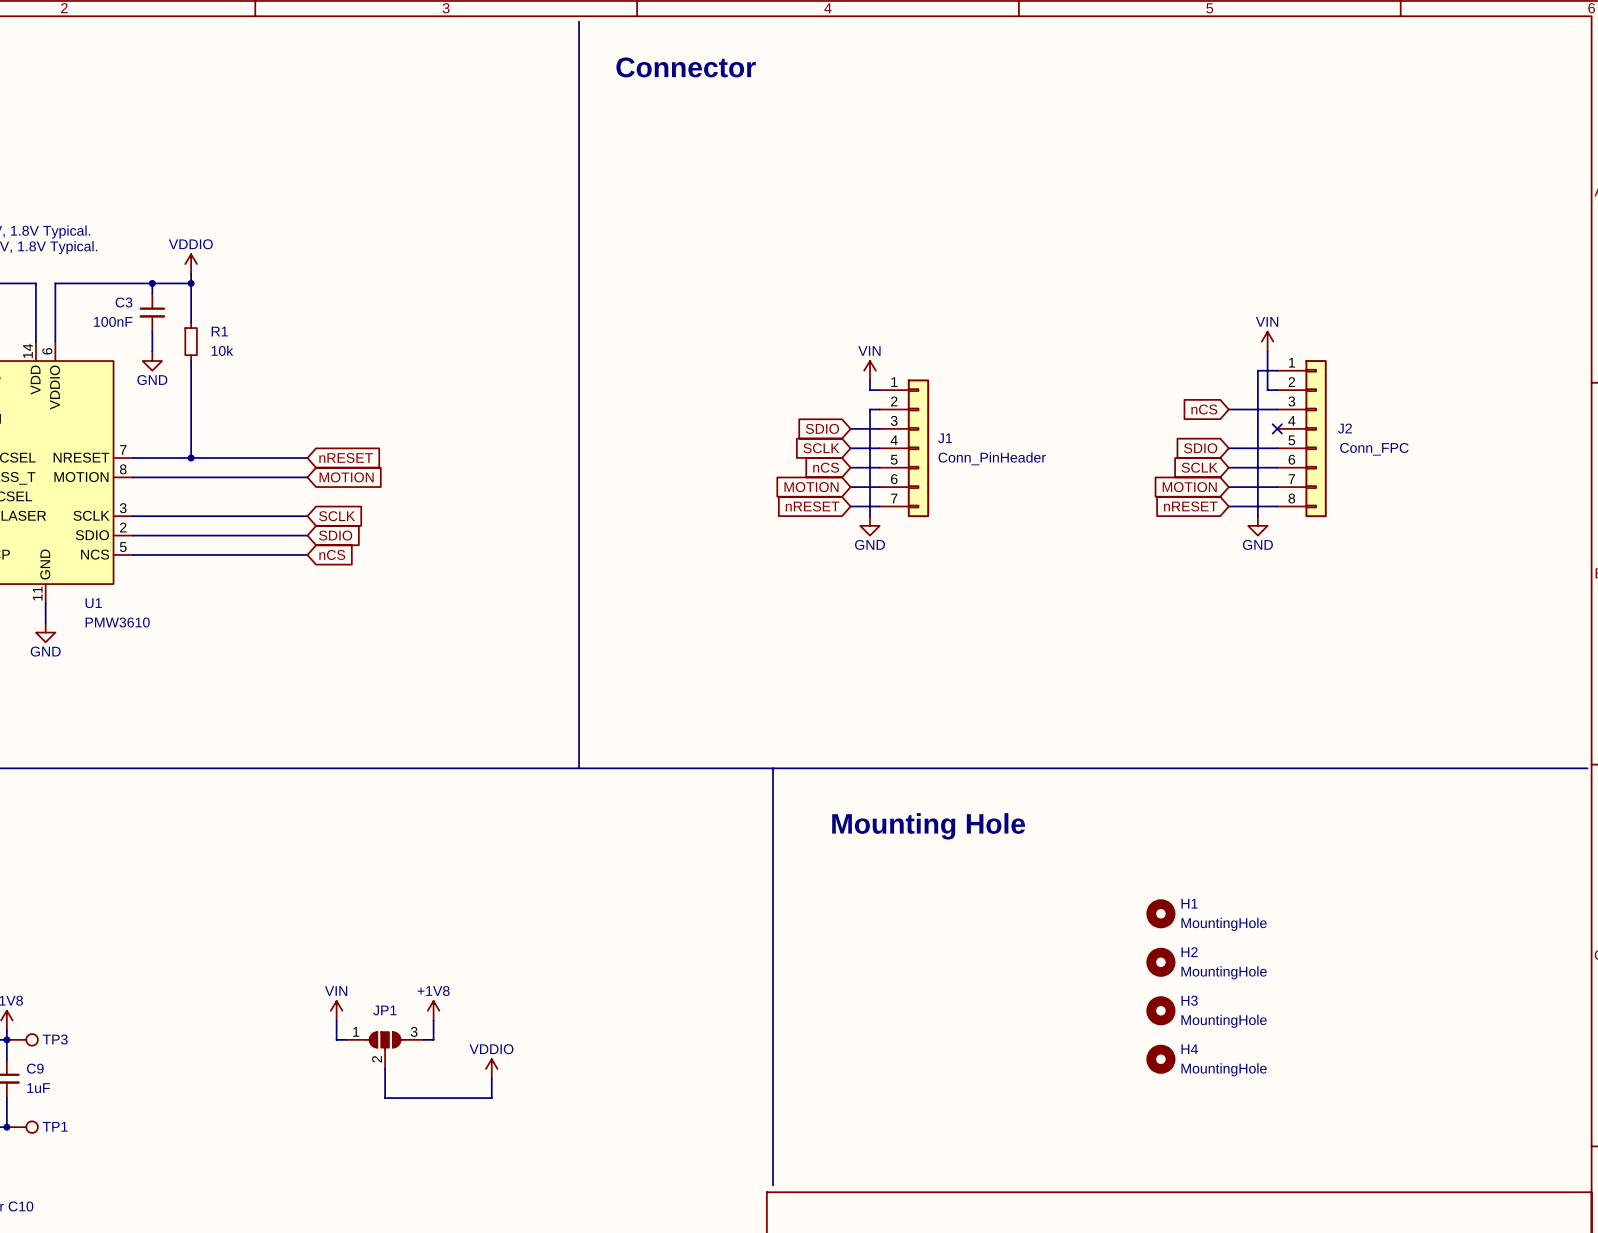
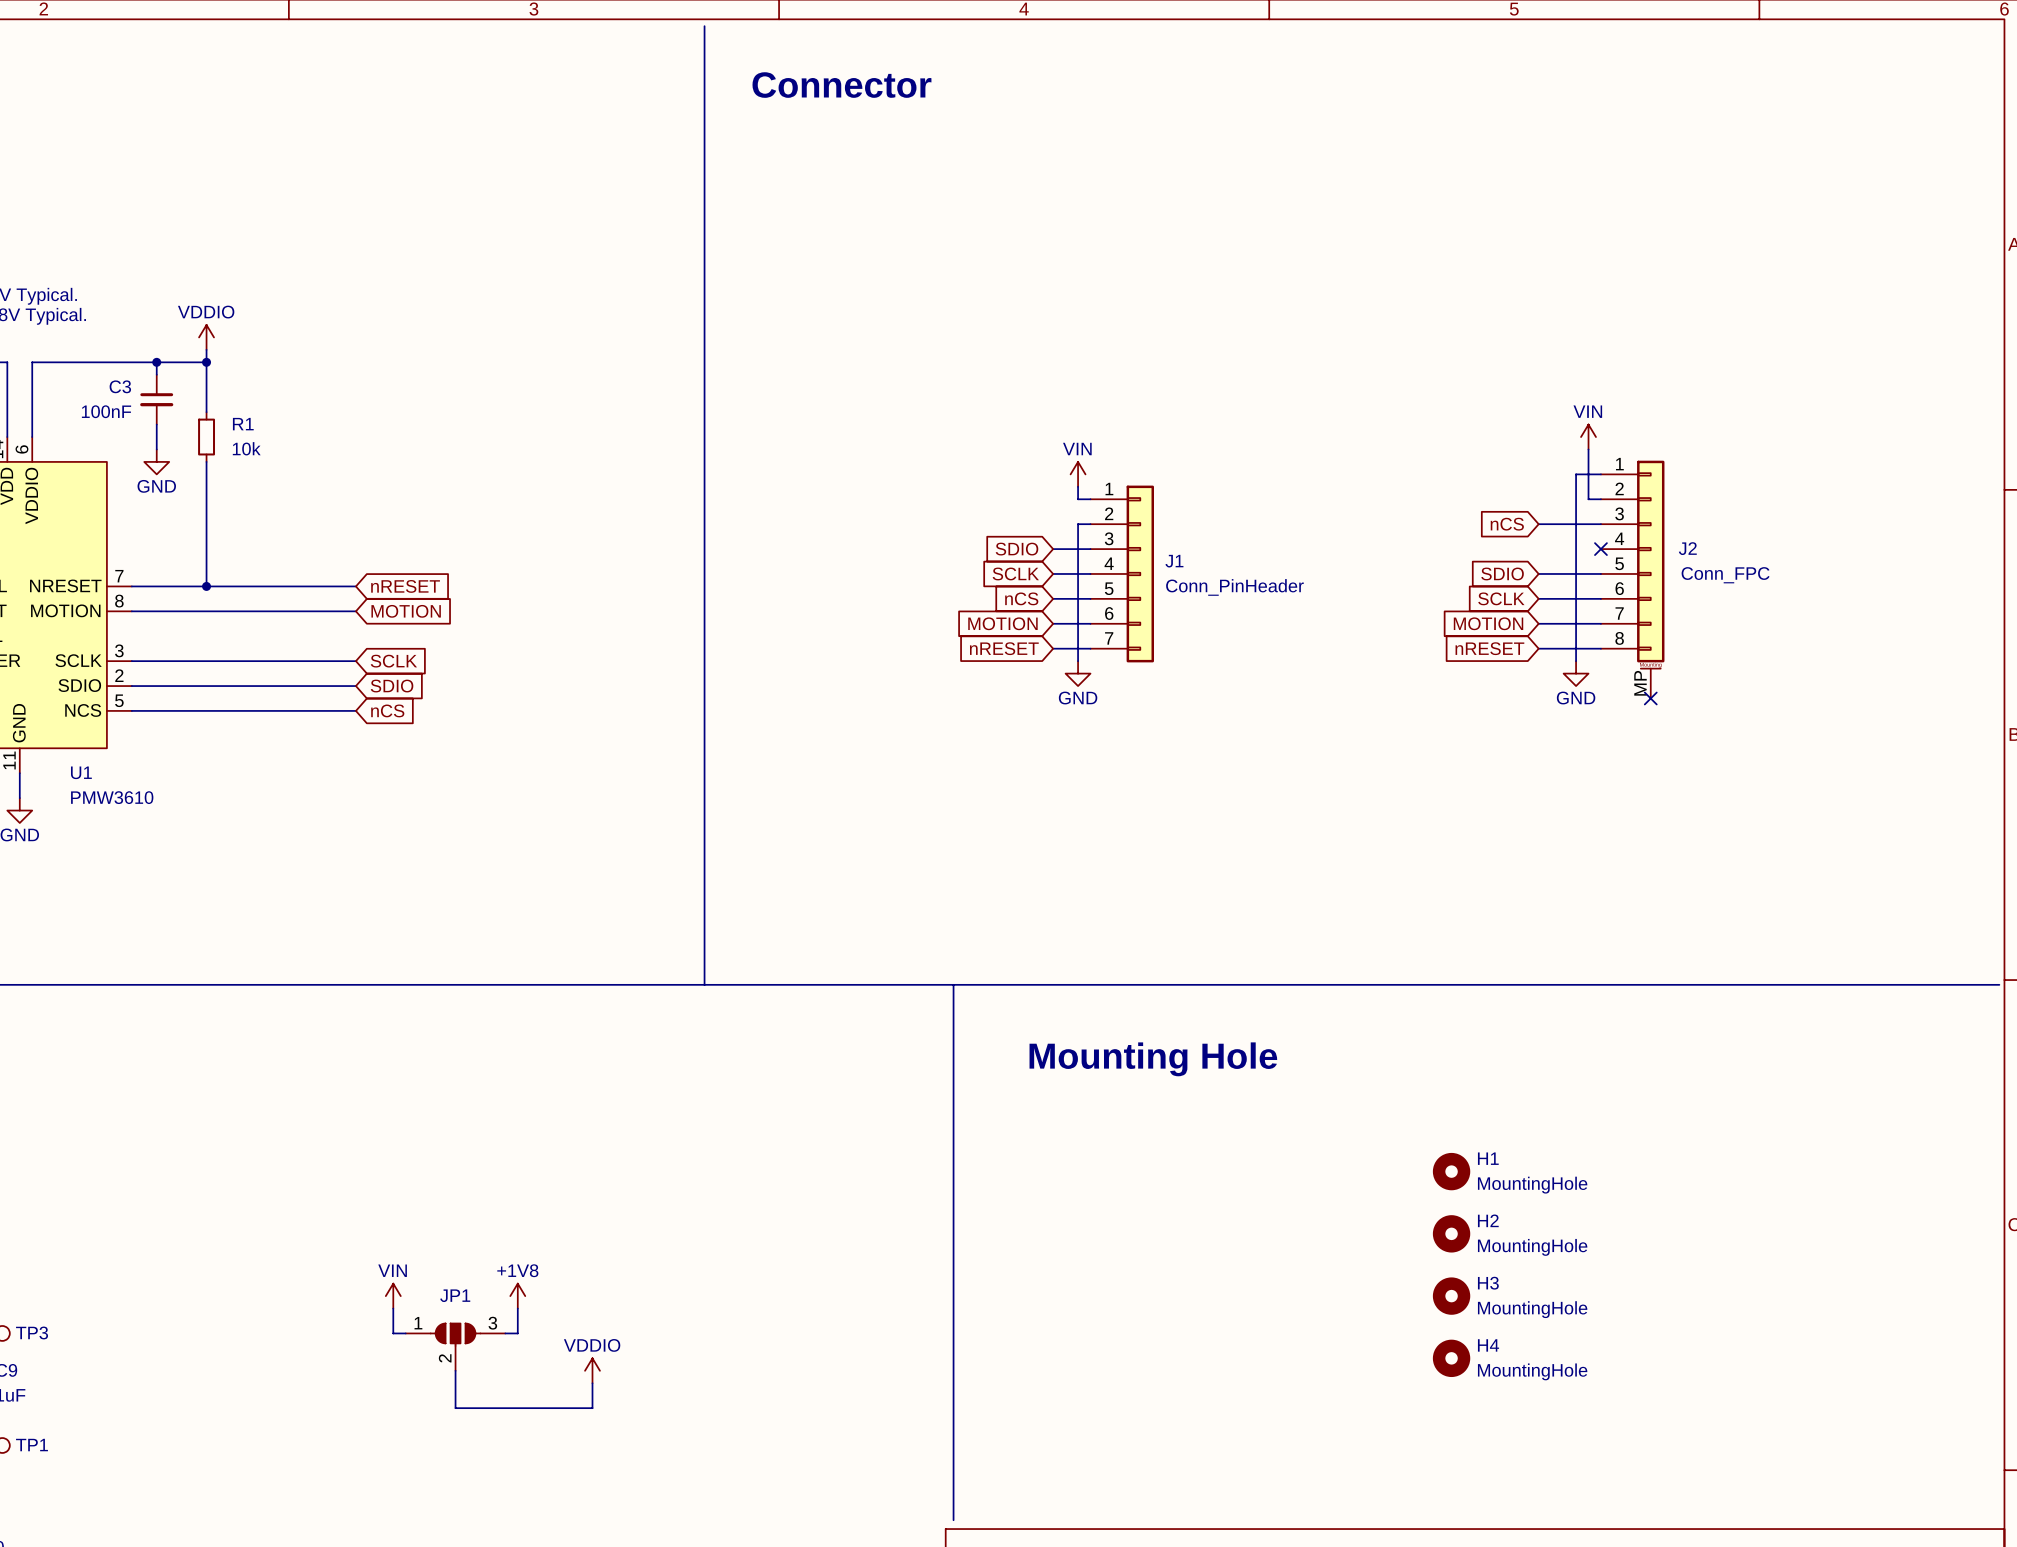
J2 symbol: [1277, 360, 1327, 518] -> [1600, 460, 1665, 699]
no-connect mark: none -> (1650, 698)

